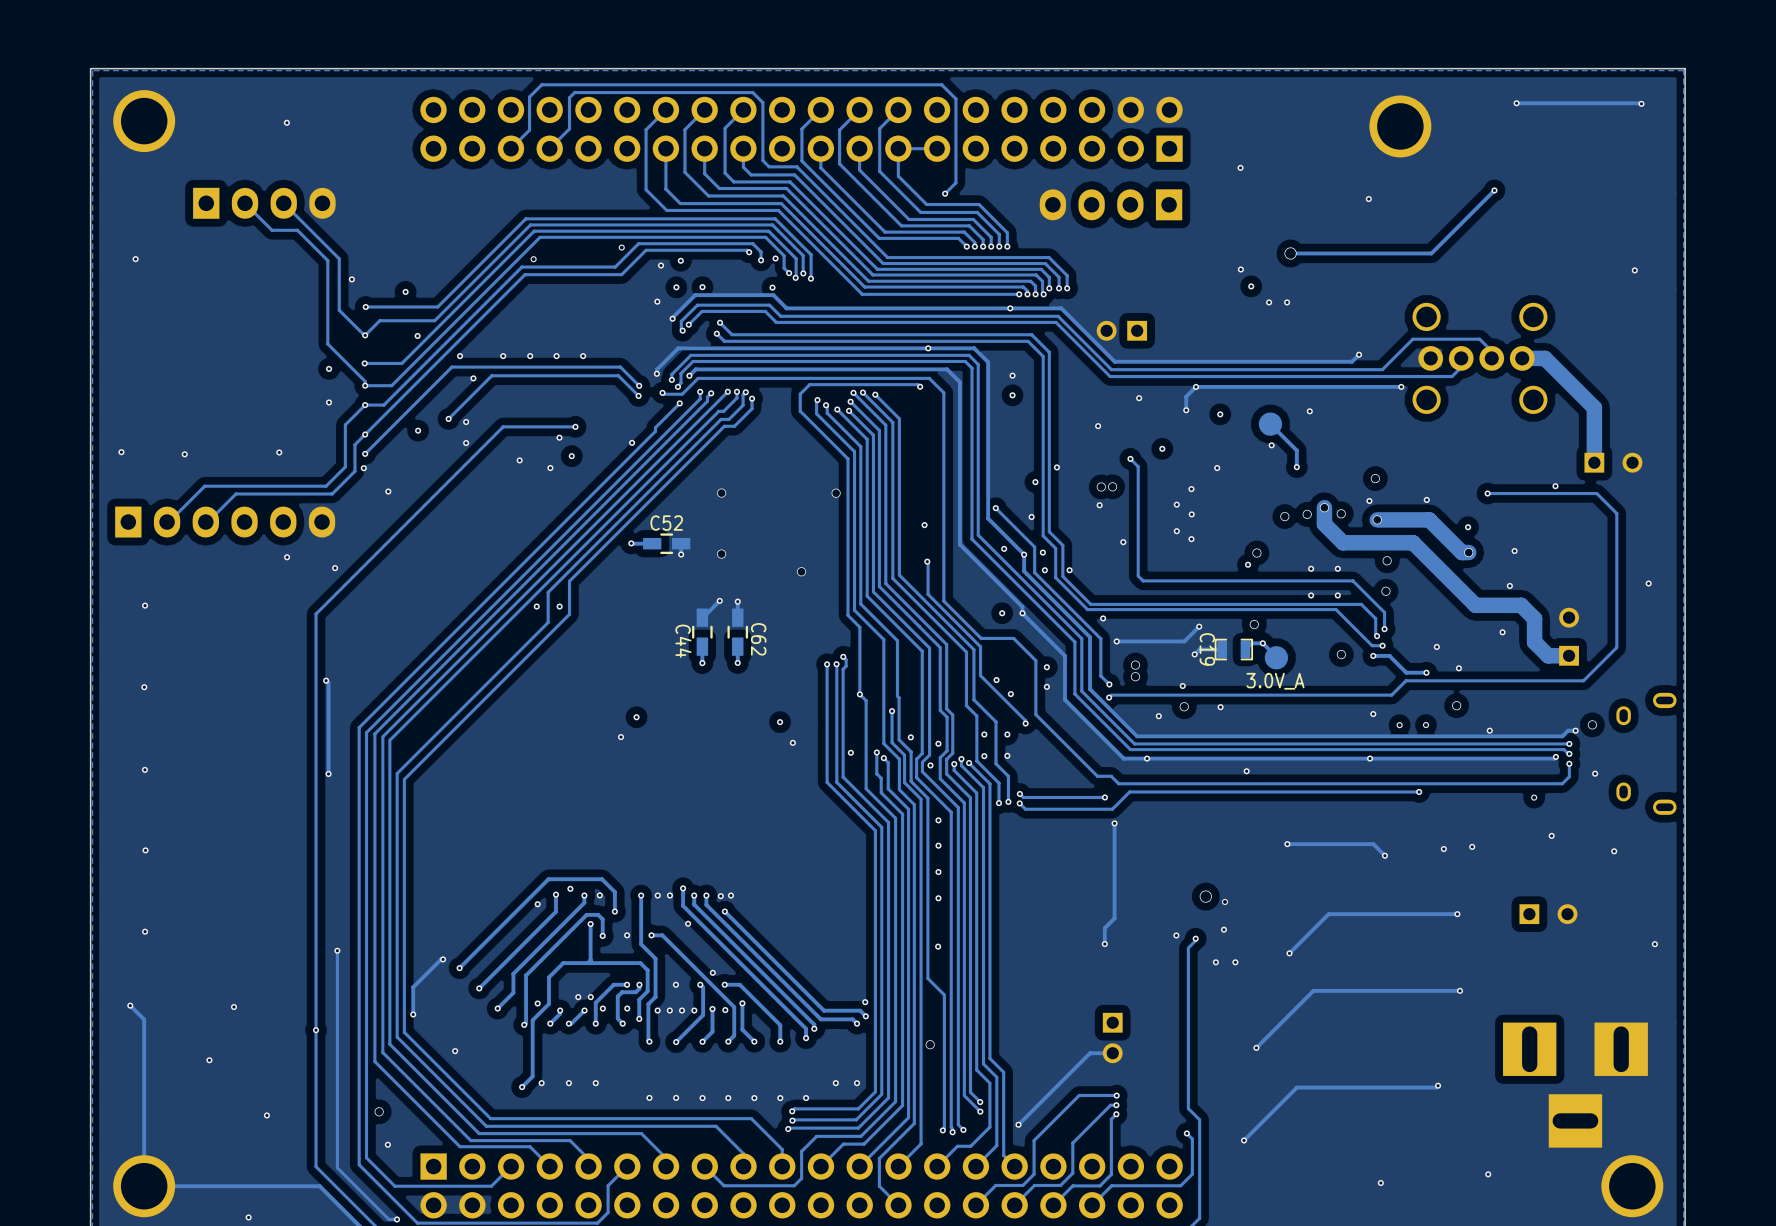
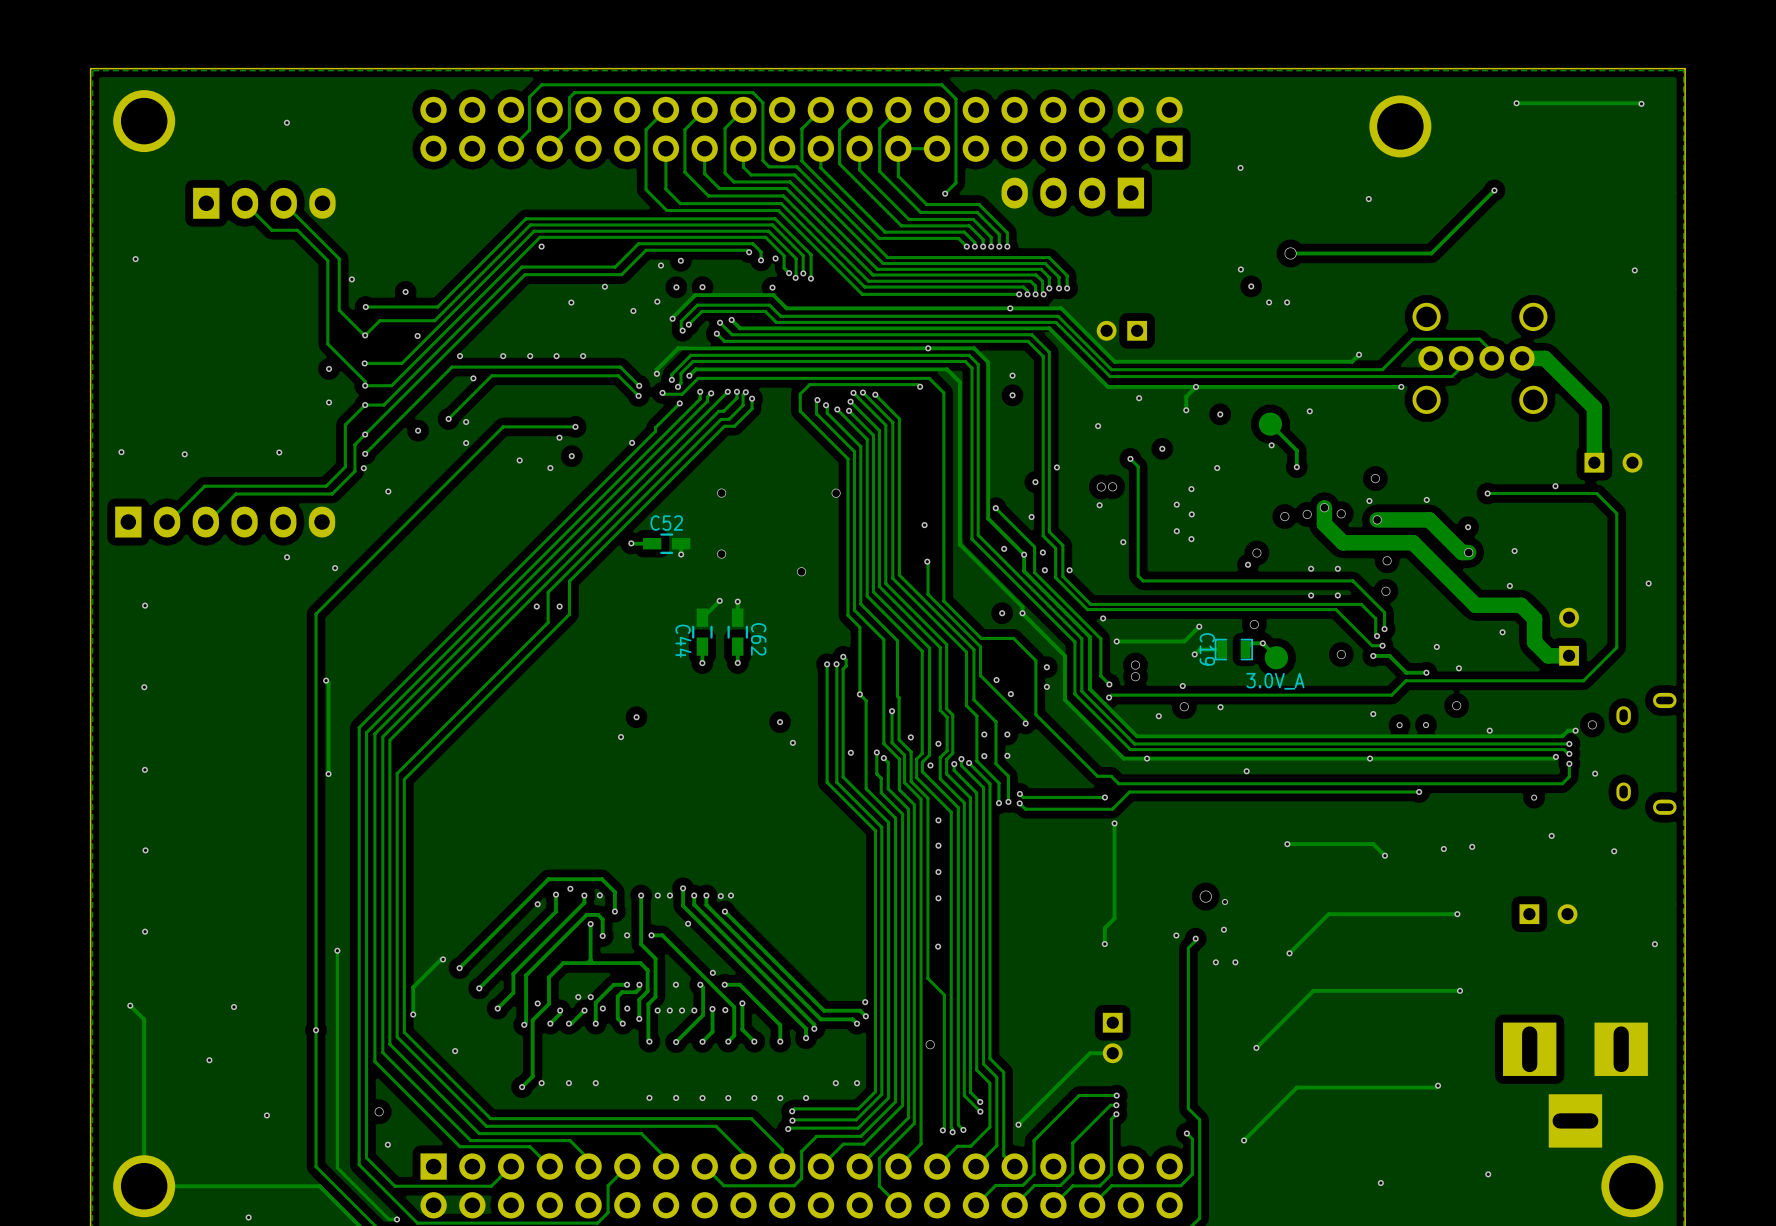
part position: (1110, 204) -> (1072, 193)
via: none -> (541, 246)
via: (621, 247) -> none
via: (533, 259) -> none
via: none -> (604, 286)
via: none -> (571, 302)
via: none -> (633, 310)
track: none -> (731, 319) (740, 328) (1049, 328) (1108, 386) (1196, 386)
via: none -> (731, 319)

